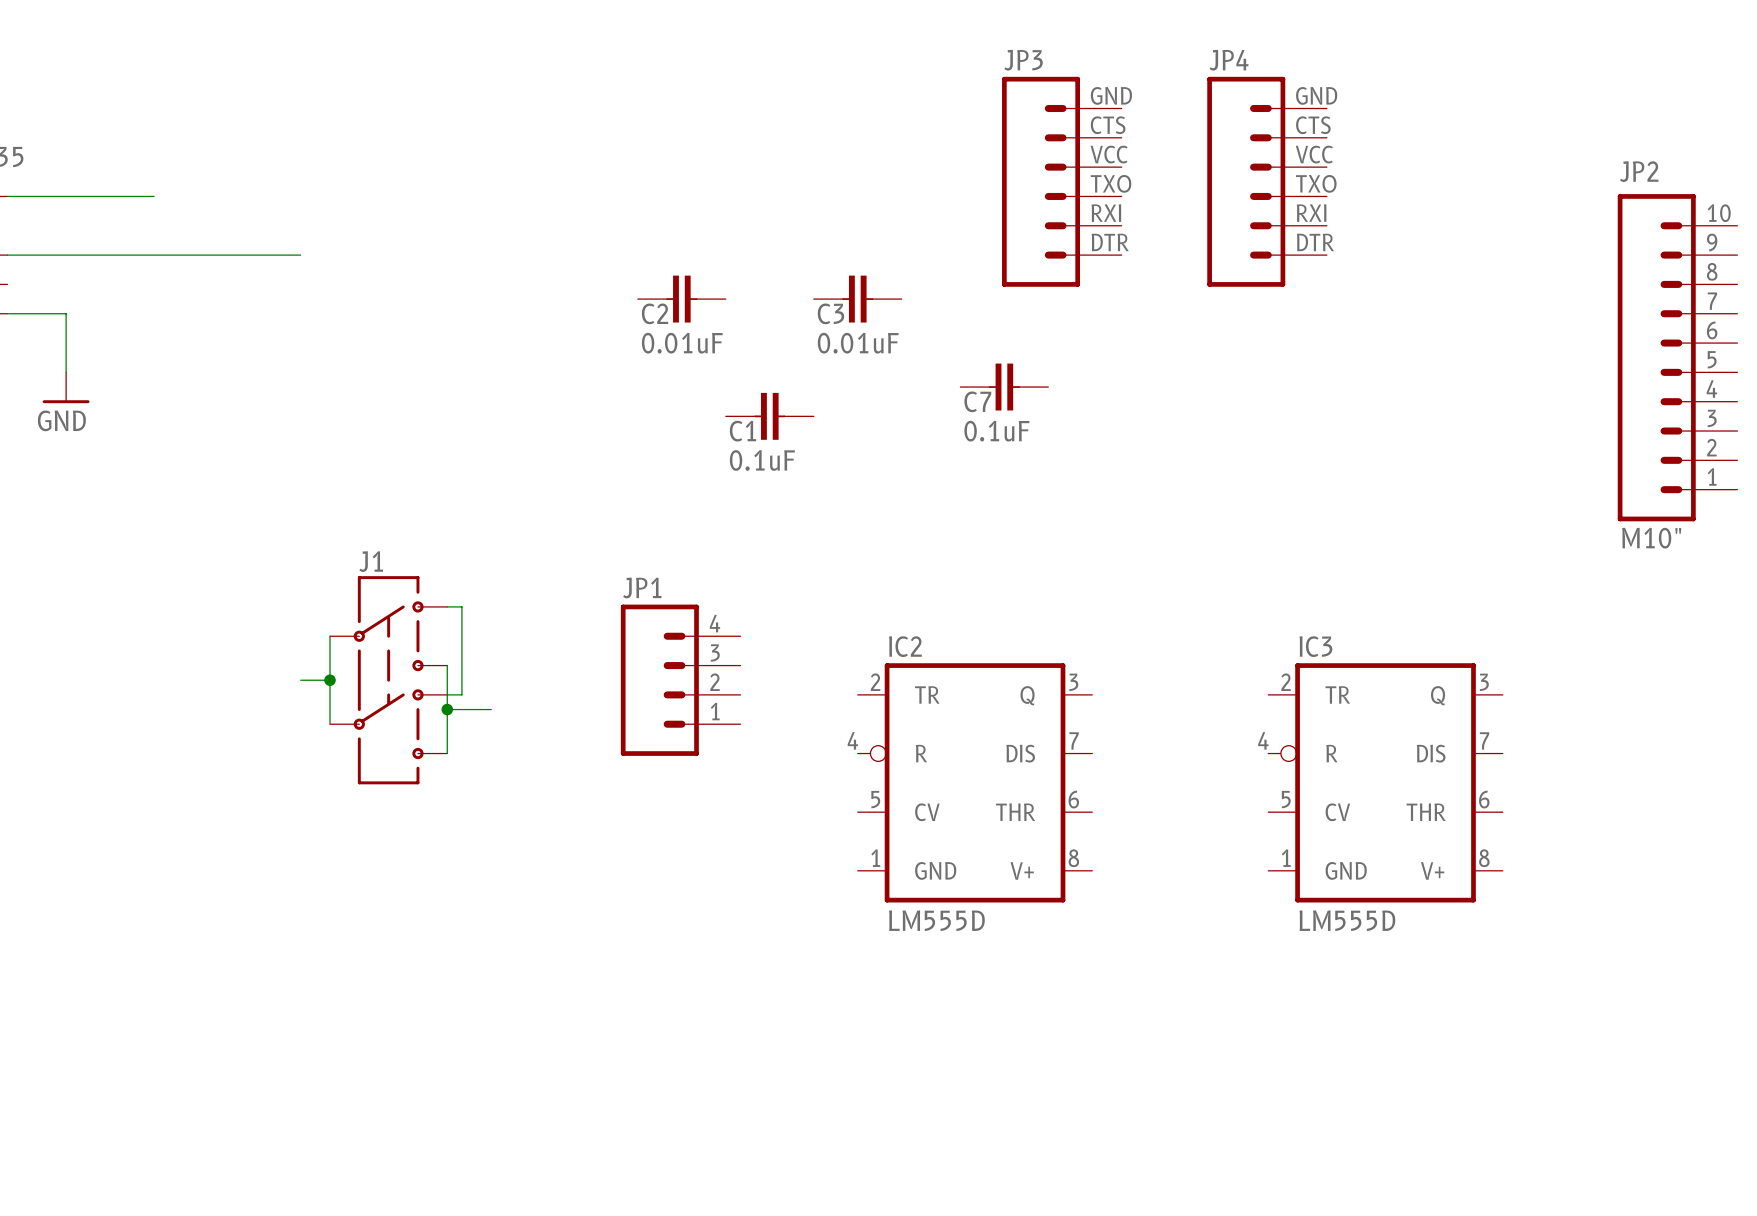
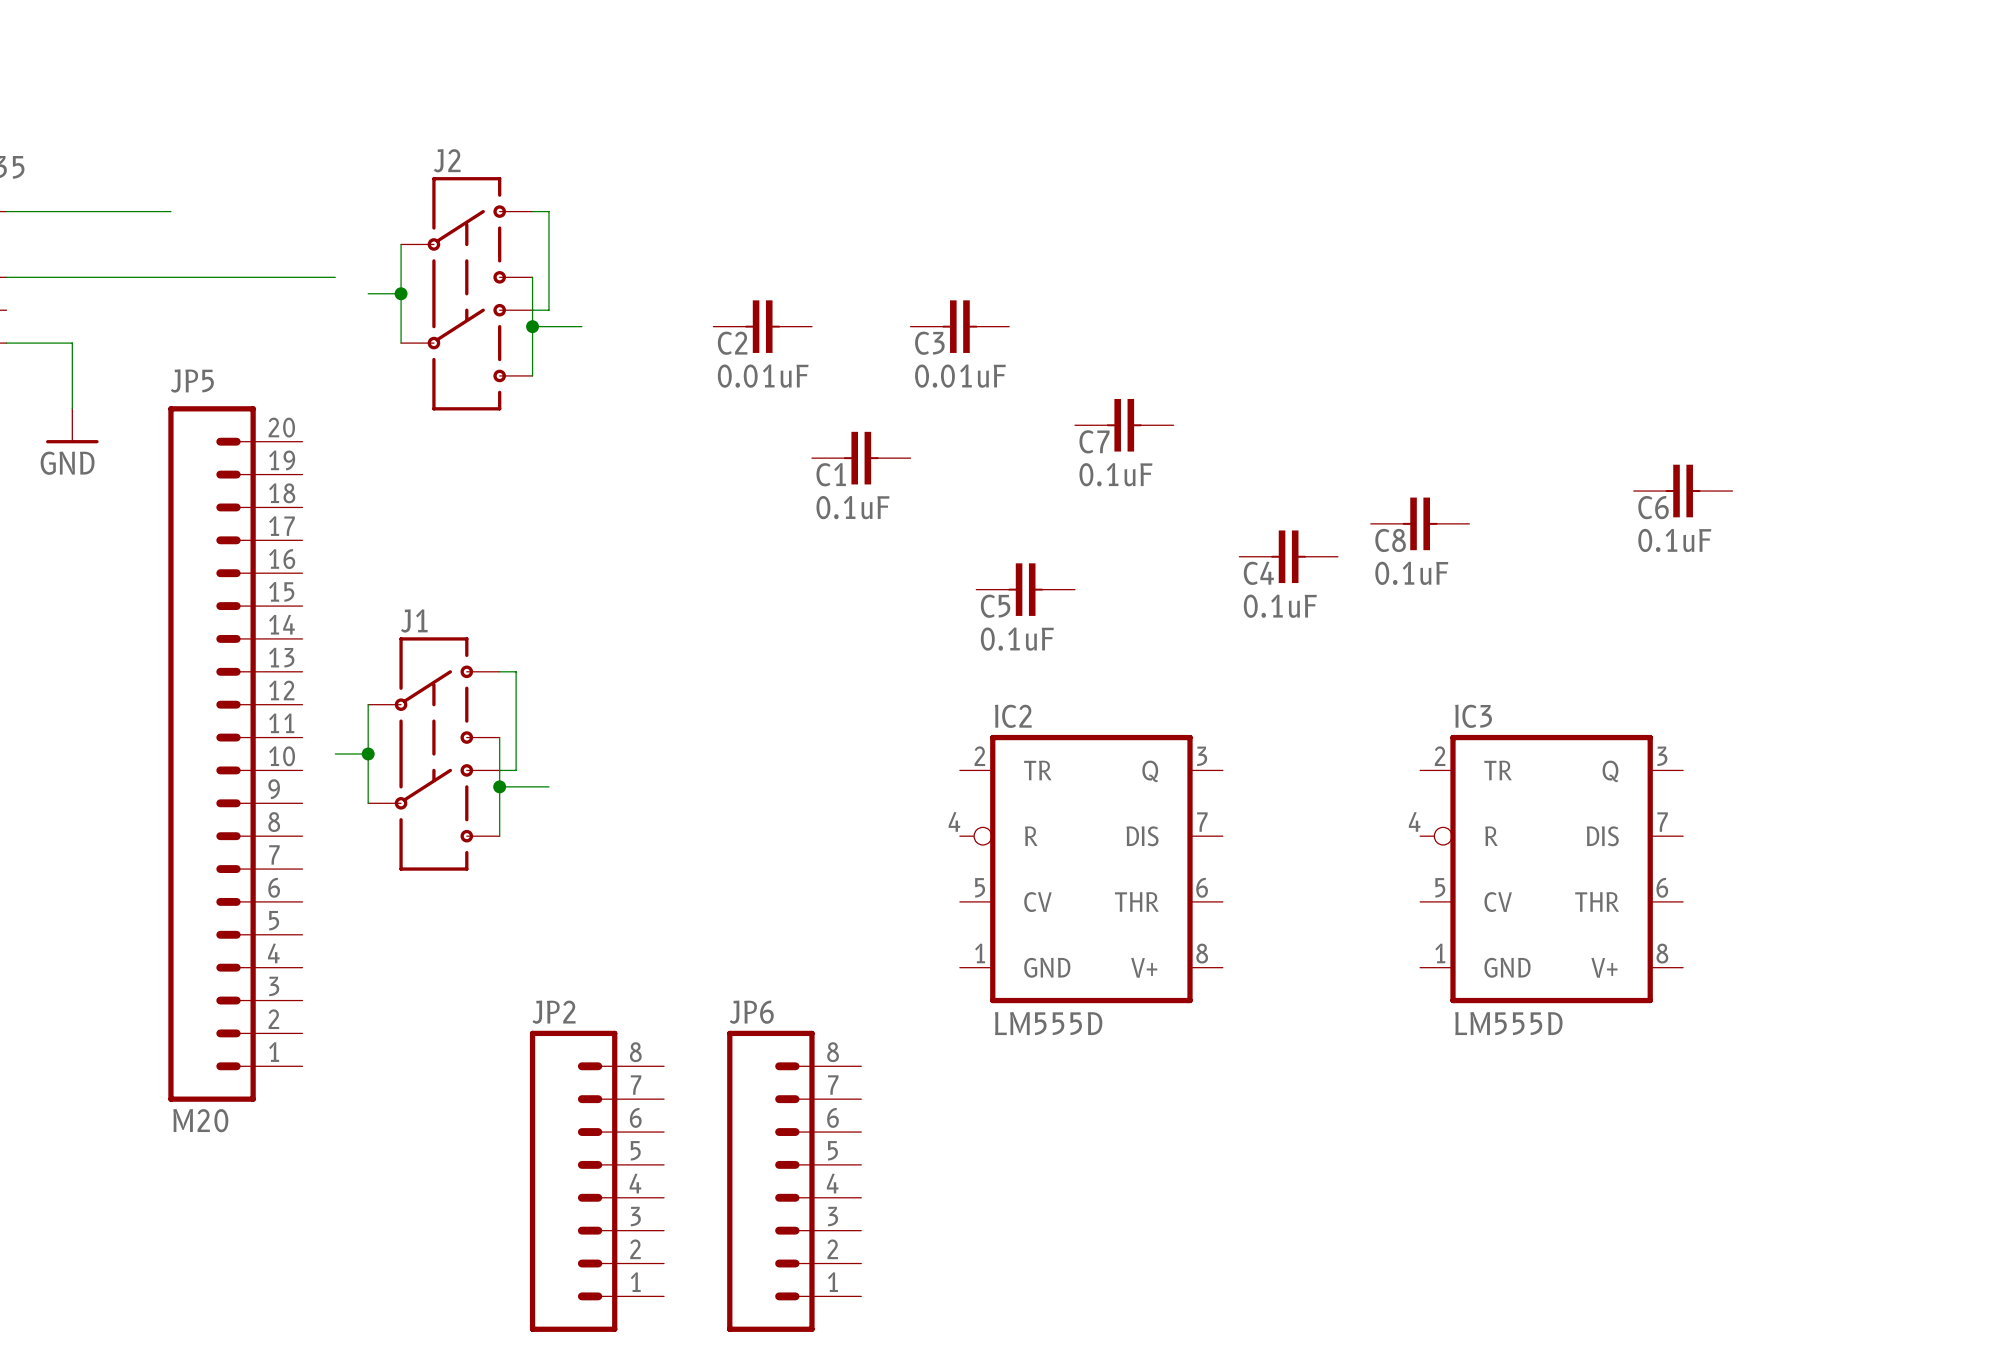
JP2 name position: JP2 (1639, 171) -> JP2 (554, 1012)
JP3: (1061, 181) -> none
JP4: (1267, 181) -> none
JP2 symbol: [1617, 194, 1738, 522] -> [529, 1030, 665, 1332]
wire: none -> (532, 211) (548, 211) (548, 310) (532, 310)
wire: none -> (401, 244) (401, 343)
wire: none -> (532, 277) (532, 375)
wire: none -> (368, 293) (401, 293)
junction: none -> (401, 293)
J2: none -> (466, 293)
wire: none -> (532, 326) (581, 326)
junction: none -> (532, 326)
C6: none -> 0.1uF (1683, 491)
C8: none -> 0.1uF (1420, 523)
C4: none -> 0.1uF (1288, 556)
C5: none -> 0.1uF (1025, 589)
JP2 value: M10" (1651, 538) -> none
JP5: none -> M20 (235, 753)
JP1: (680, 680) -> none
JP6: none -> (794, 1181)

